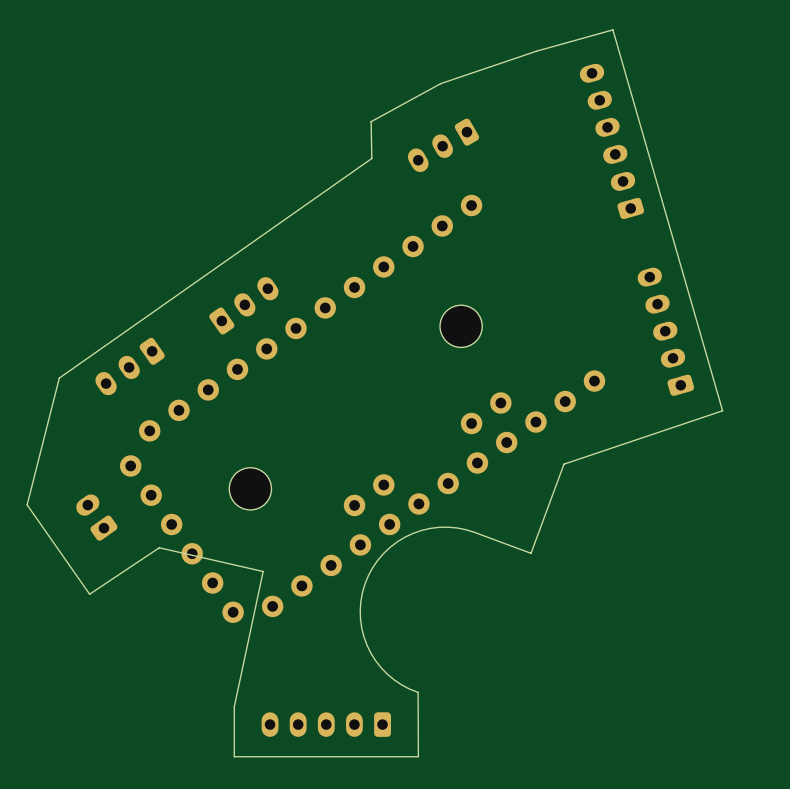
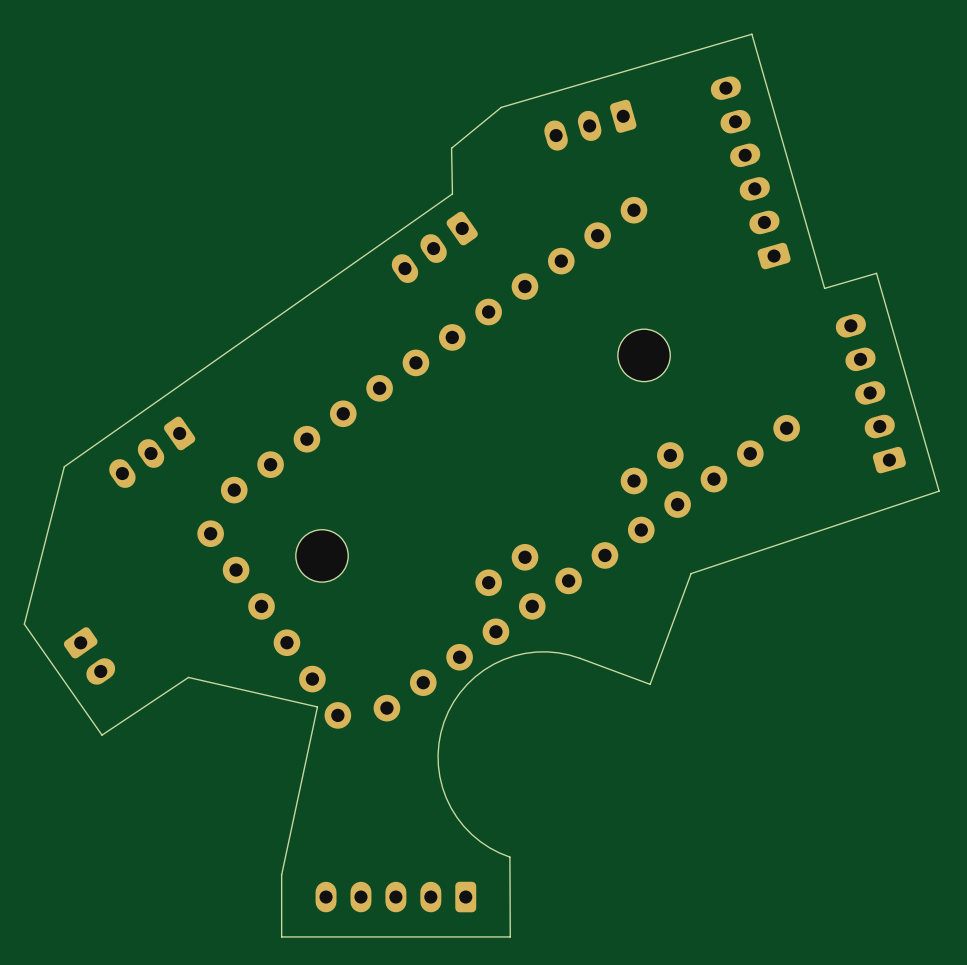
part: none -> (590, 125)
board edge: (371, 121) (440, 83) (536, 51) (612, 29) (722, 410) (563, 464) -> (451, 148) (501, 107) (751, 34) (824, 288) (876, 273) (939, 491) (691, 573)
part: (443, 145) -> none
part: none -> (434, 247)
part: (243, 305) -> none
part position: (461, 326) -> (644, 355)
part position: (665, 331) -> (870, 393)
part position: (362, 408) -> (498, 462)
part position: (250, 488) -> (322, 555)
part rotation: 0° (96, 517) -> 180° (89, 655)

